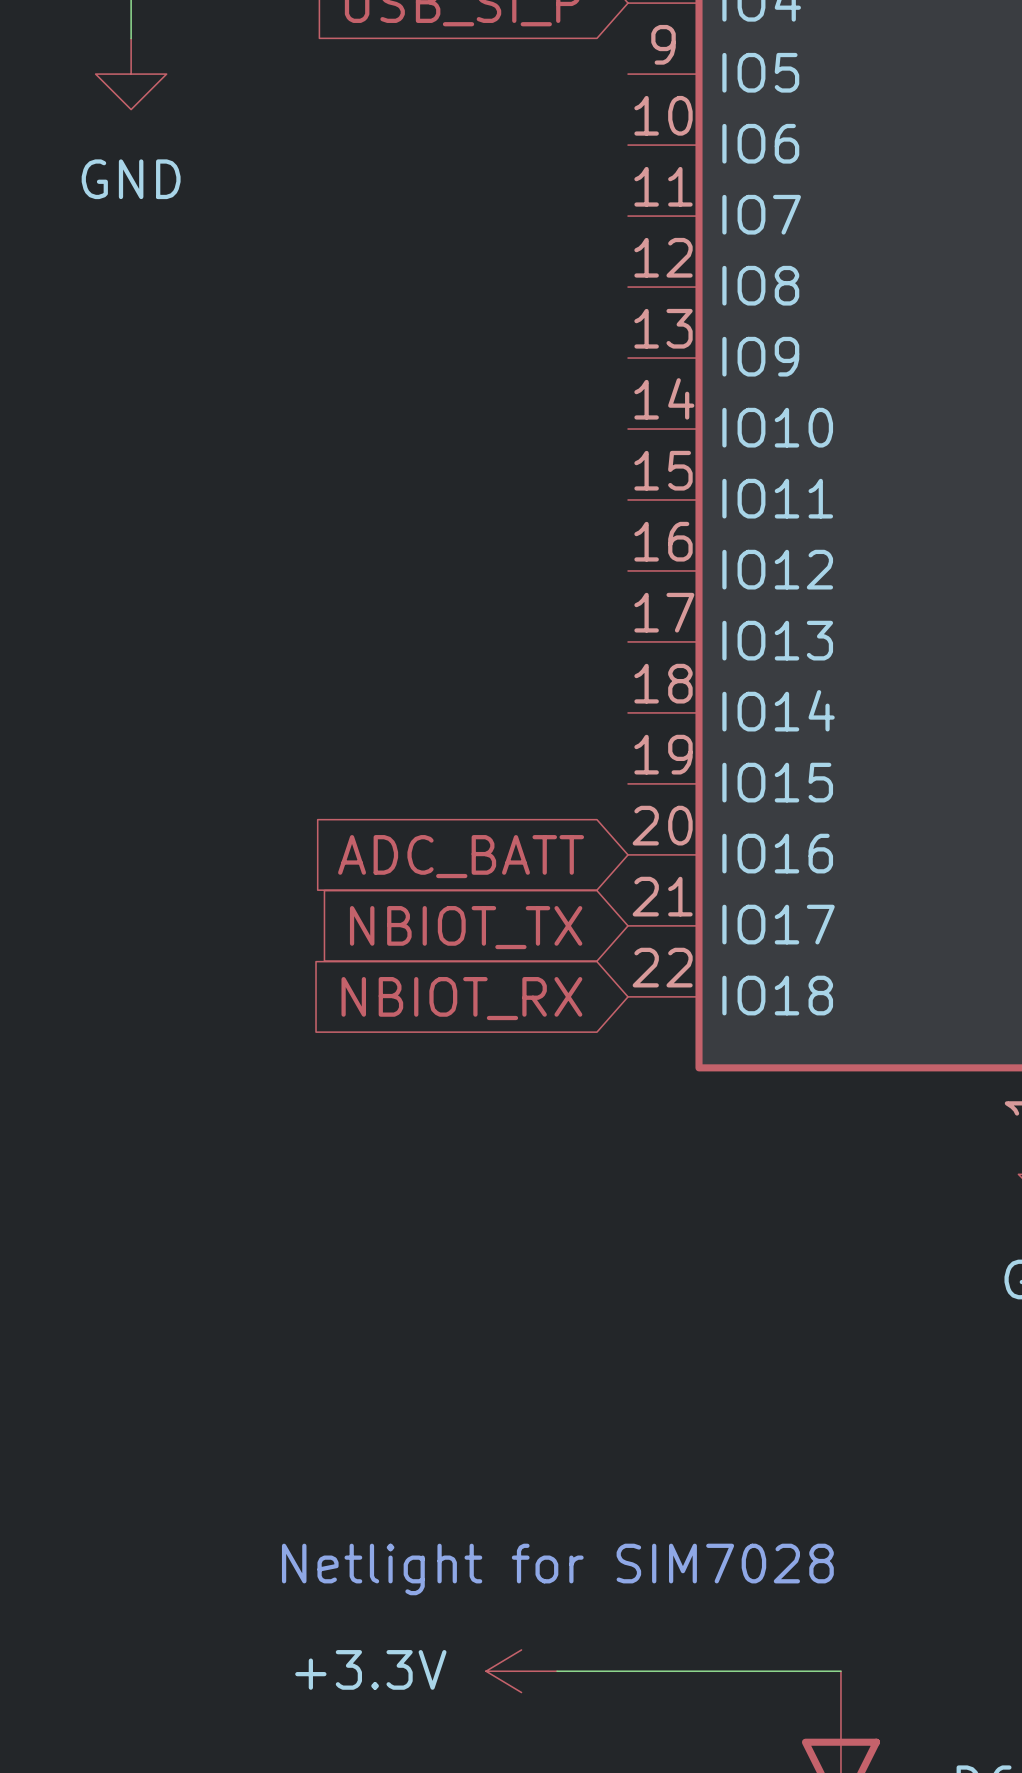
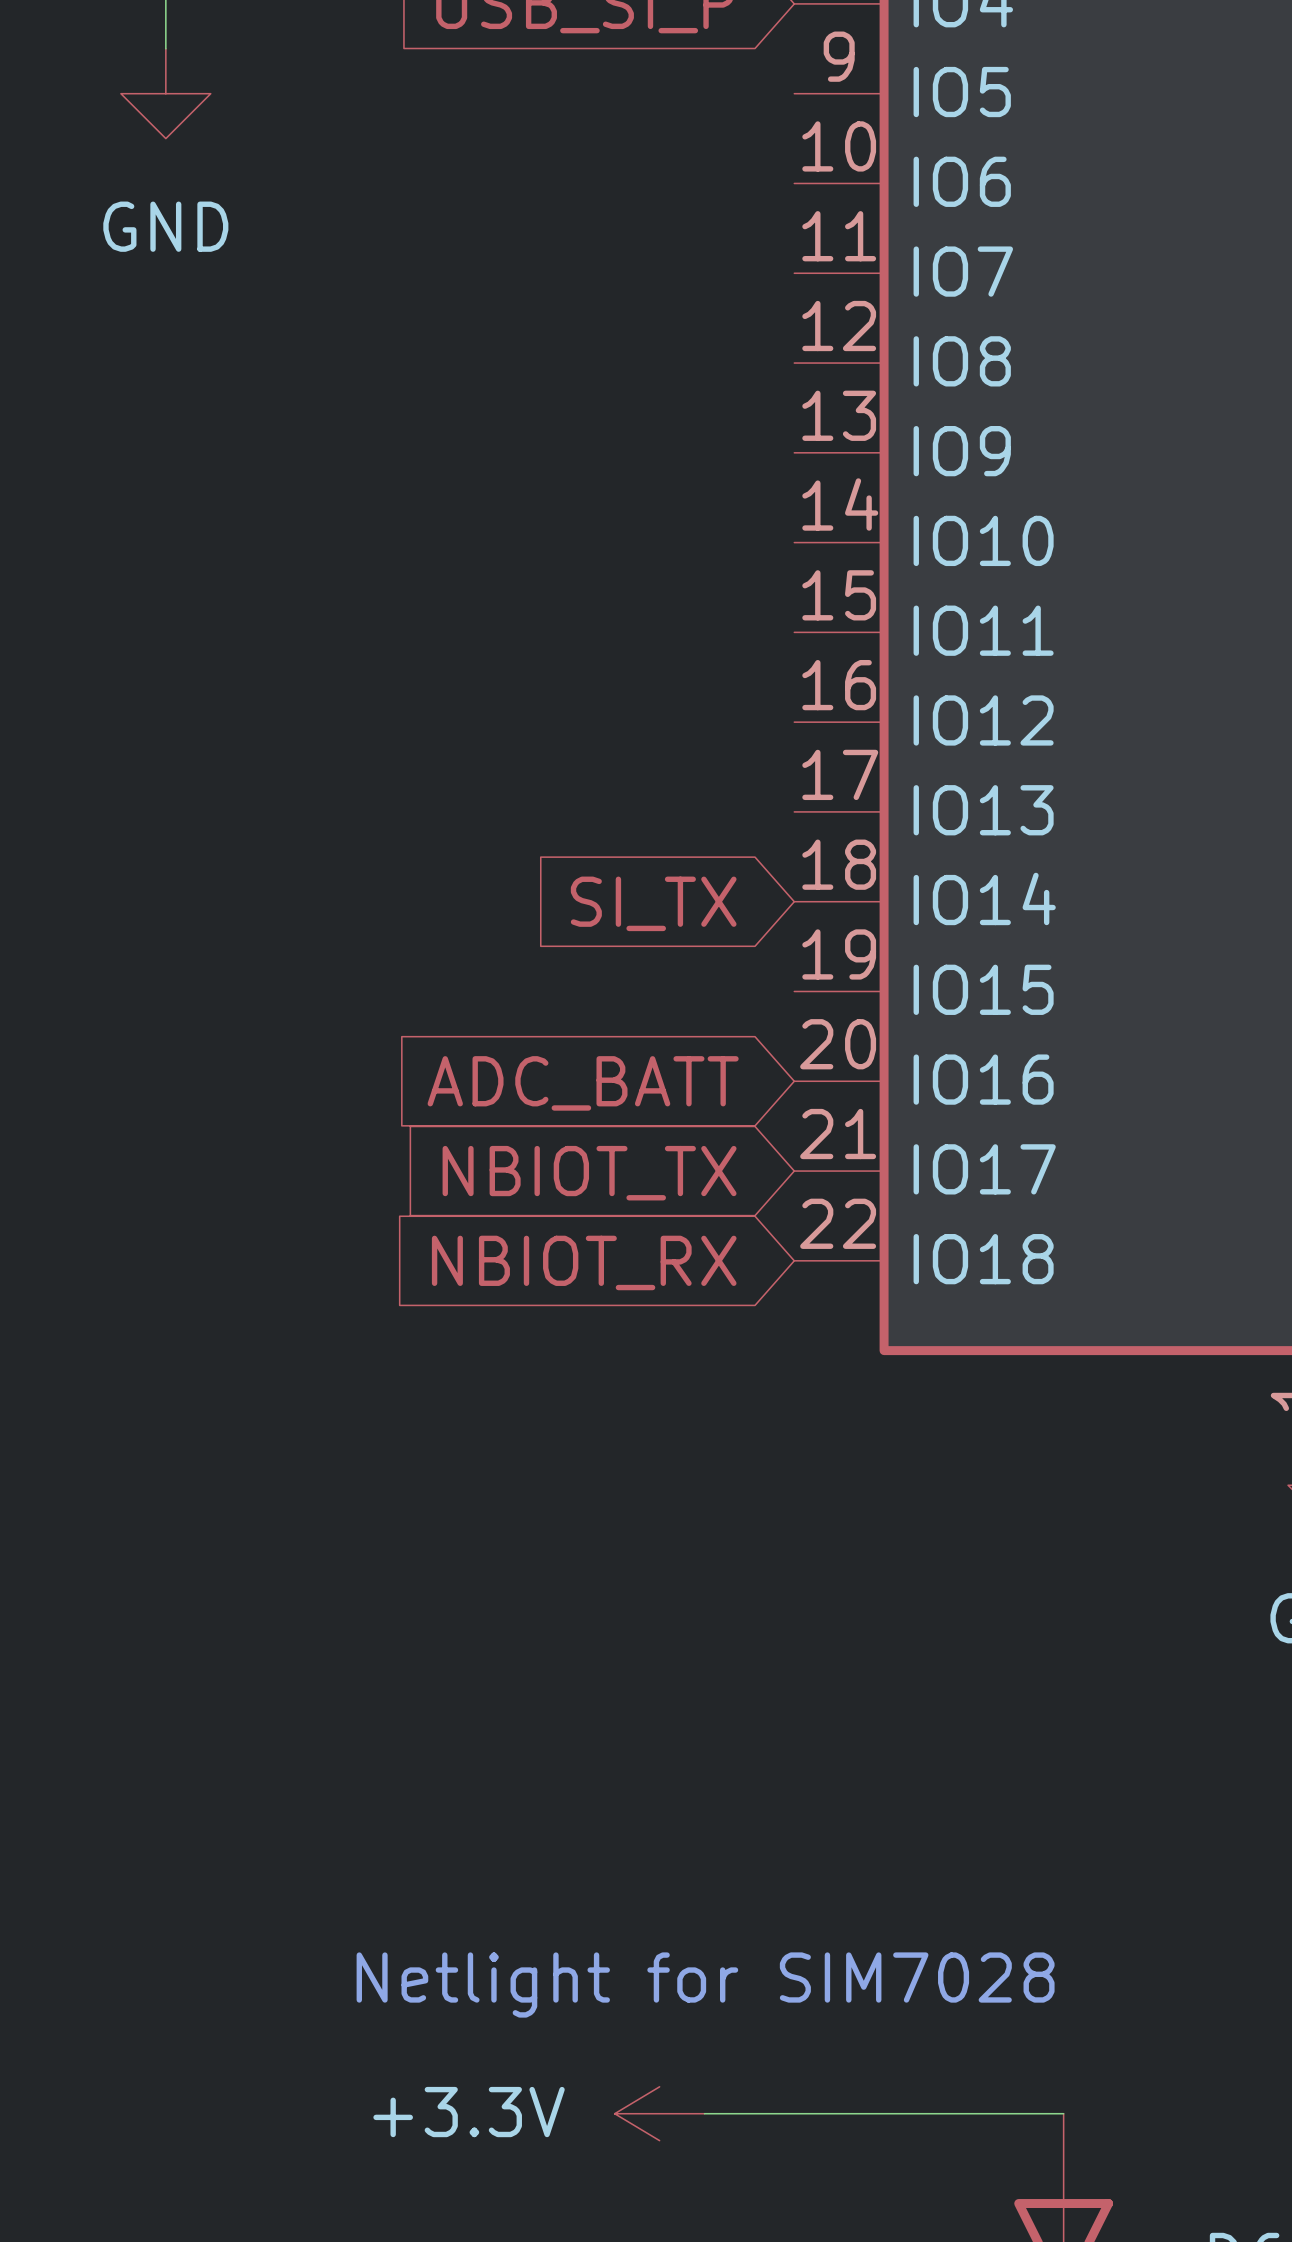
global label: none -> SI_TX (653, 903)

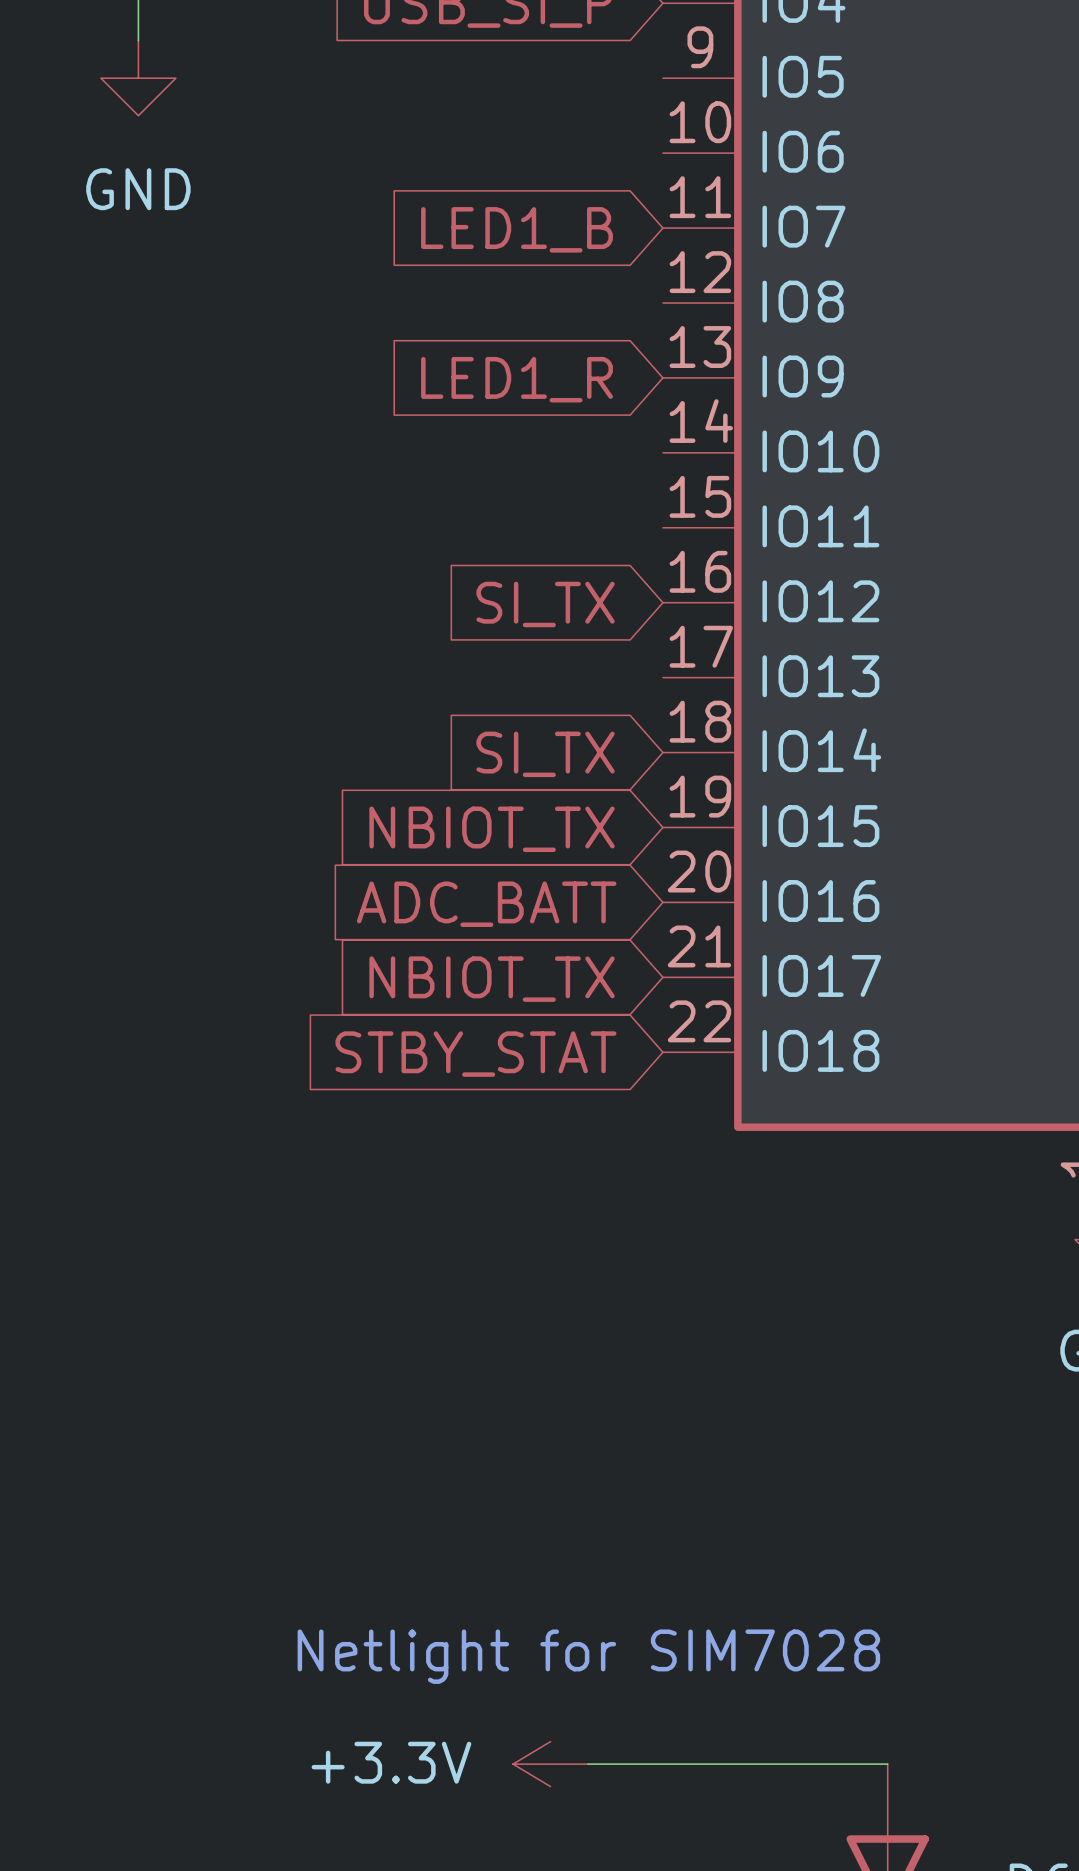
global label: none -> LED1_B (517, 229)
global label: none -> LED1_R (517, 379)
global label: none -> SI_TX (545, 604)
global label: none -> NBIOT_TX (492, 829)
global label: NBIOT_RX (584, 1262) -> STBY_STAT (475, 1054)

